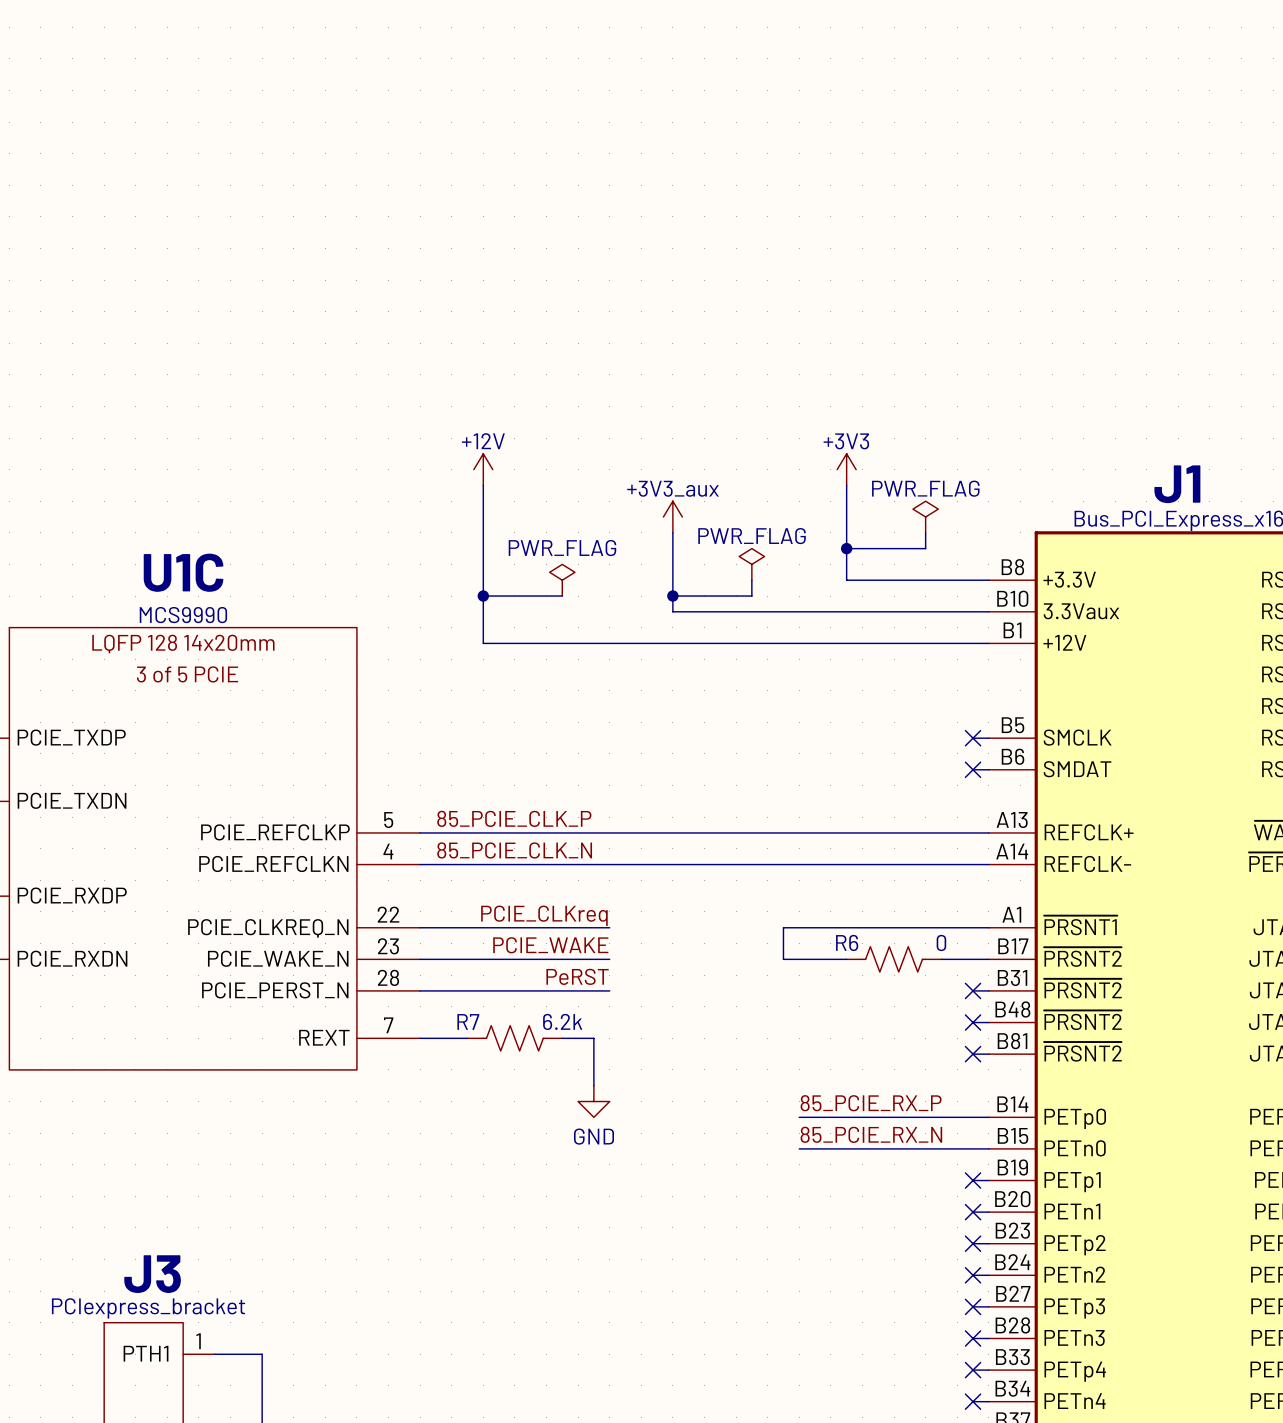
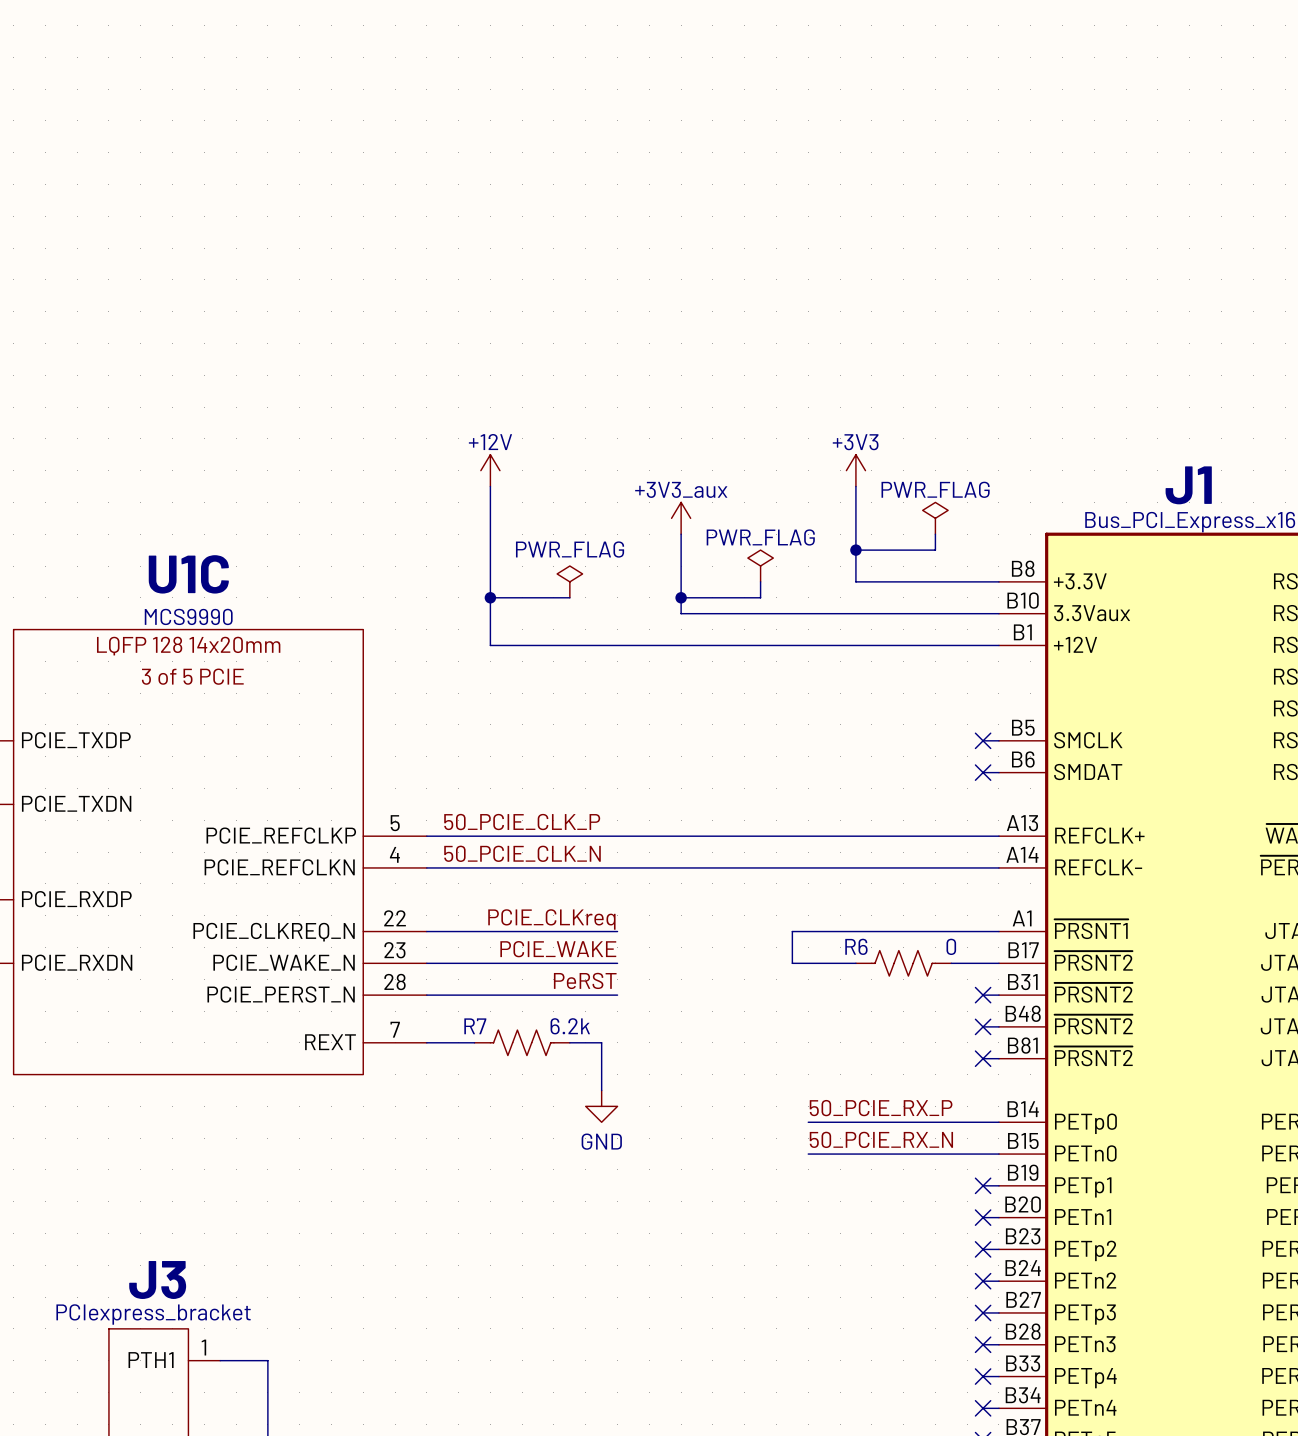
label: 85_PCIE_CLK_P (514, 818) -> 50_PCIE_CLK_P (522, 822)
label: 85_PCIE_CLK_N (514, 850) -> 50_PCIE_CLK_N (522, 853)
label: 85_PCIE_RX_P (871, 1103) -> 50_PCIE_RX_P (881, 1108)
label: 85_PCIE_RX_N (871, 1134) -> 50_PCIE_RX_N (881, 1139)

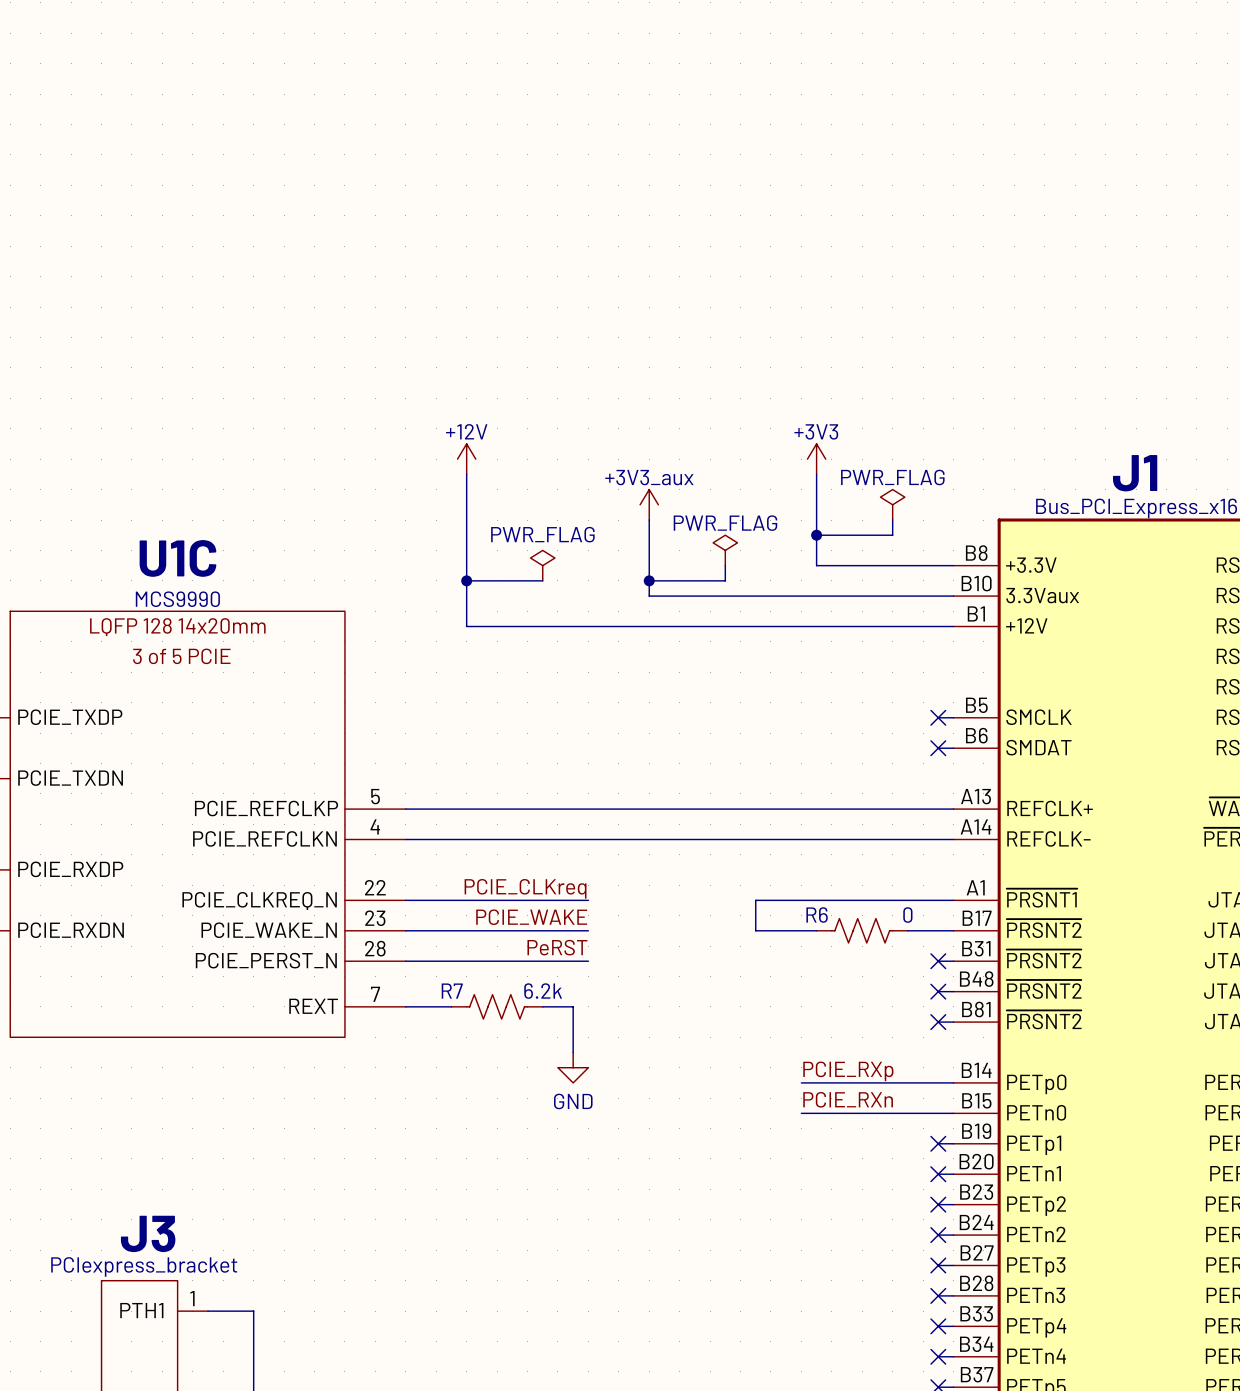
label: 50_PCIE_CLK_P (522, 822) -> none
label: 50_PCIE_CLK_N (522, 853) -> none
label: 50_PCIE_RX_P (881, 1108) -> none
label: none -> PCIE_RXp (848, 1071)
wire: (808, 1122) (840, 1122) -> none
label: 50_PCIE_RX_N (881, 1139) -> none
label: none -> PCIE_RXn (848, 1099)
wire: (808, 1154) (840, 1154) -> none

